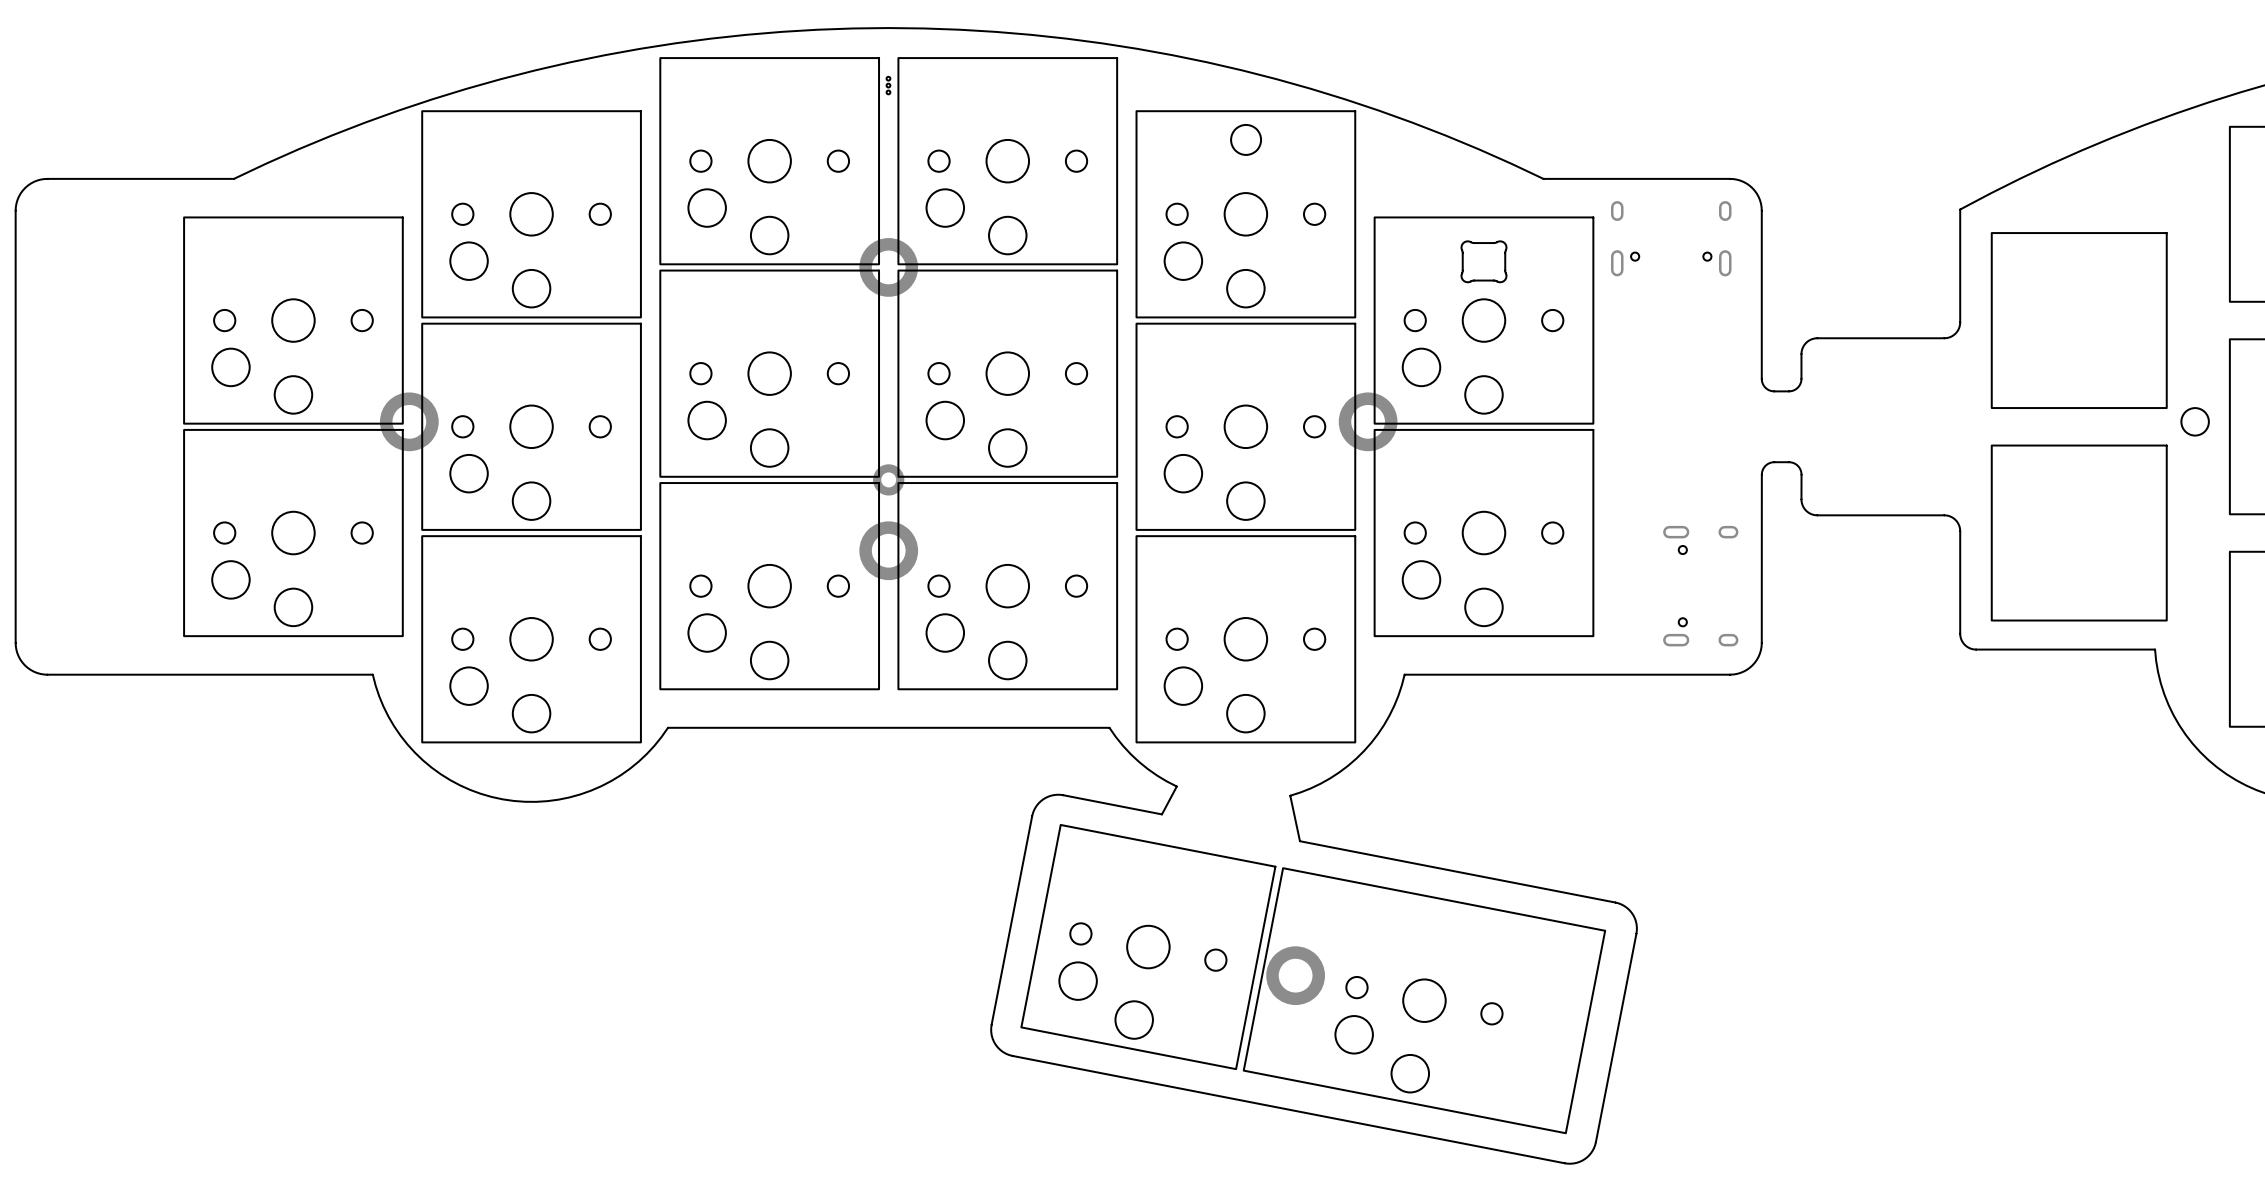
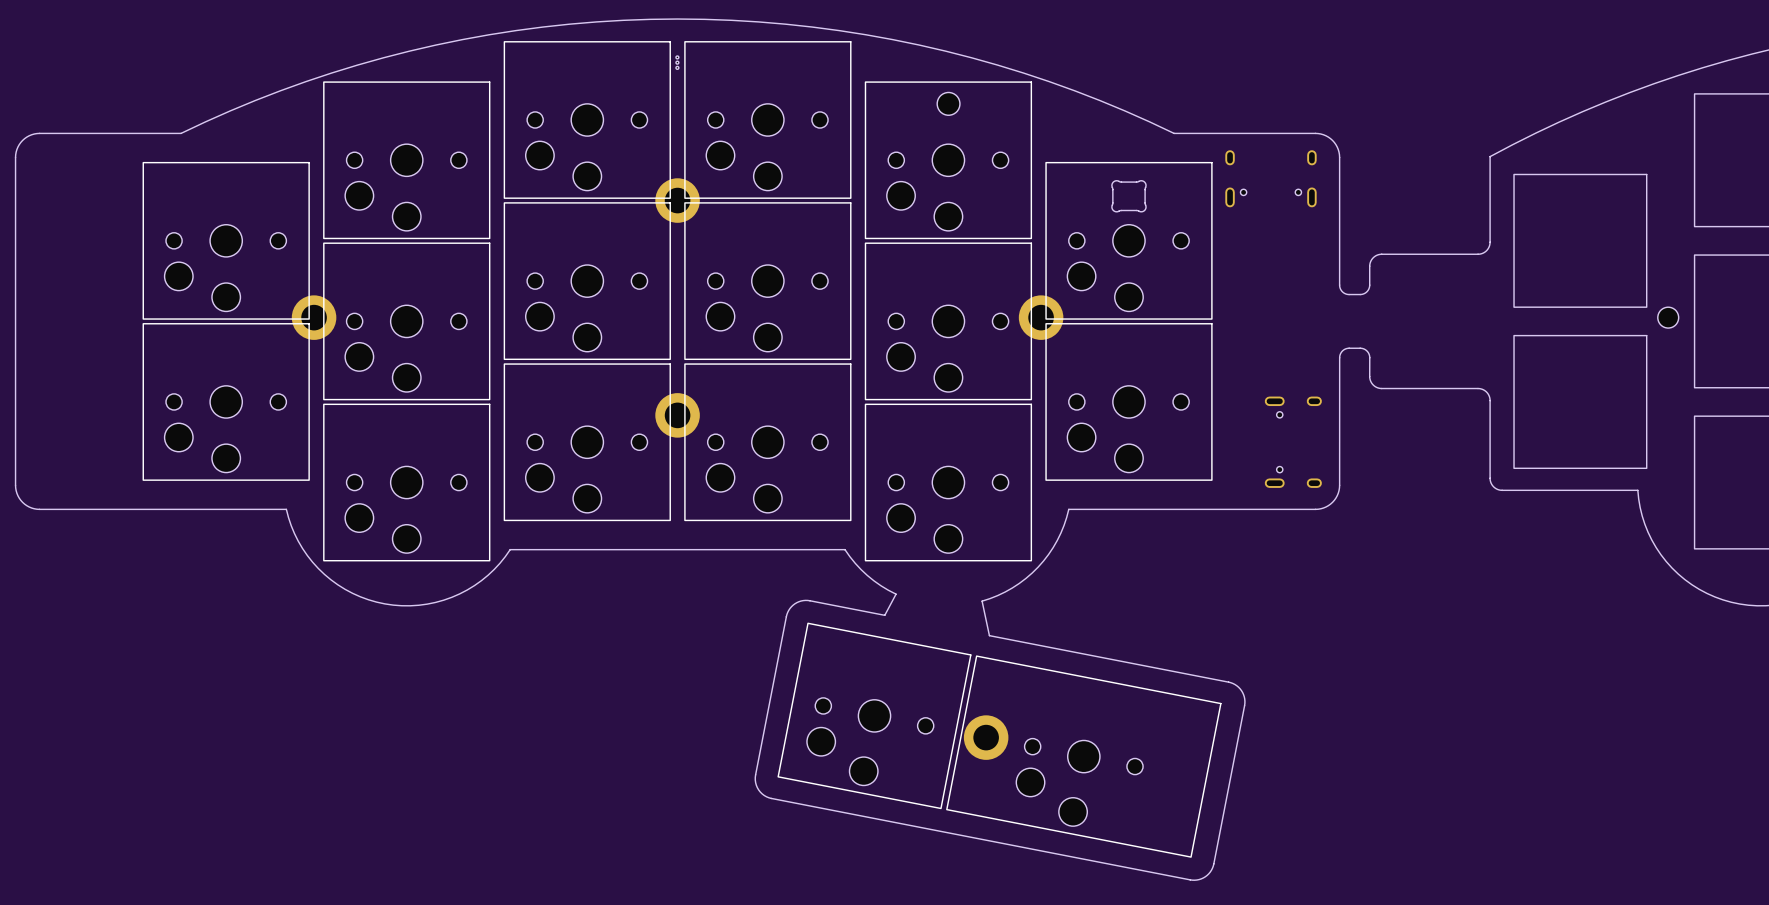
part: (888, 479) -> none

